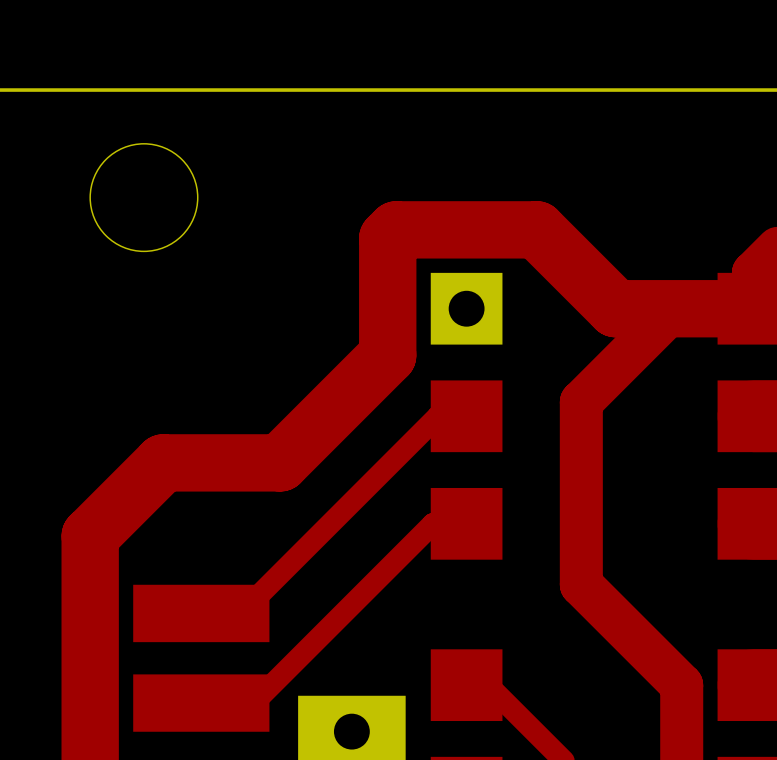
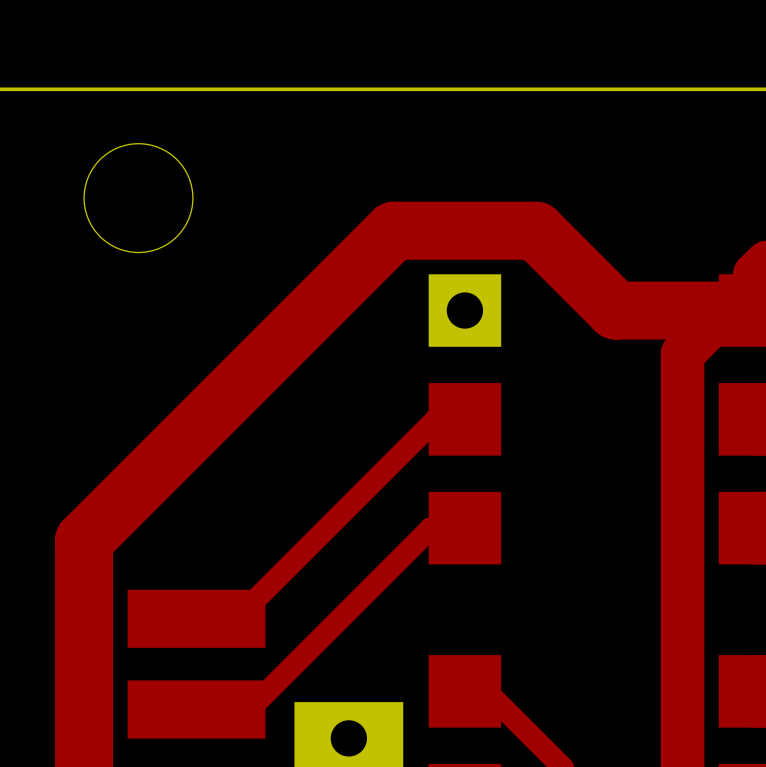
top track: (387, 238) (387, 355) (280, 462) (163, 462) -> (385, 239) (158, 466)
top track: (724, 308) (674, 308) (581, 401) (581, 584) (681, 685) -> (726, 310) (682, 354) (682, 691)

